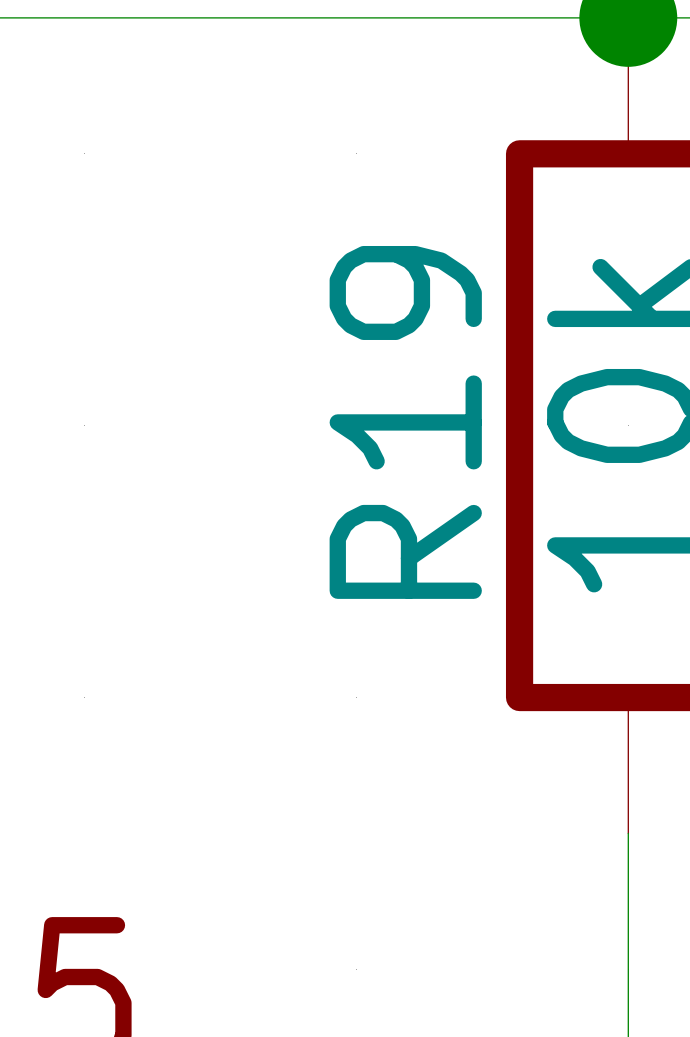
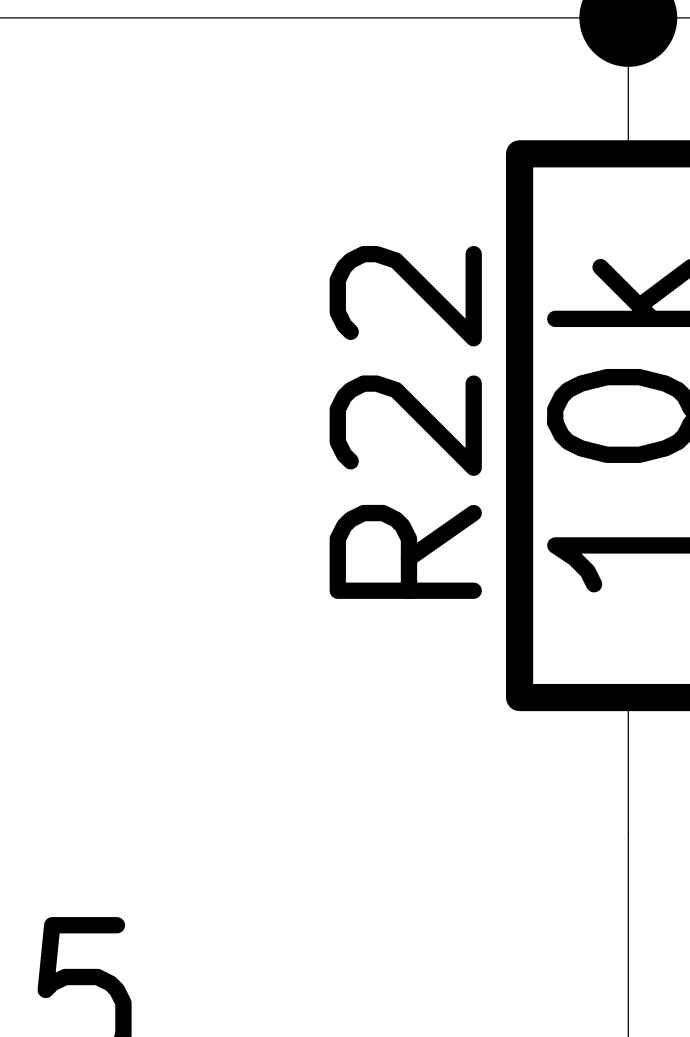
R19 name: R19 (405, 422) -> R22 (405, 422)

